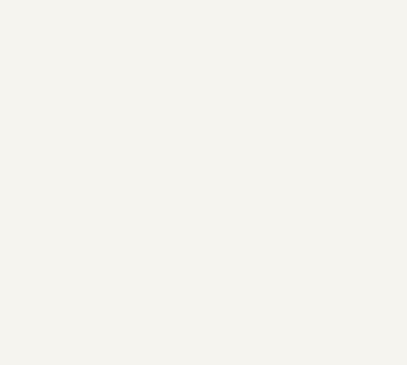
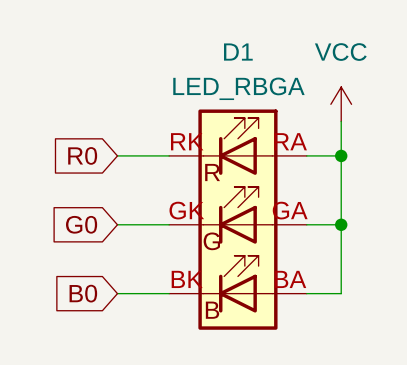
power symbol: none -> VCC (341, 104)
wire: none -> (341, 121) (341, 293) (306, 293)
global label: none -> R0 (82, 155)
wire: none -> (117, 155) (169, 155)
wire: none -> (306, 155) (341, 155)
junction: none -> (341, 155)
D1: none -> LED_RBGA (237, 219)
global label: none -> G0 (81, 224)
wire: none -> (117, 224) (169, 224)
wire: none -> (306, 224) (341, 224)
junction: none -> (341, 224)
global label: none -> B0 (83, 293)
wire: none -> (117, 293) (169, 293)

